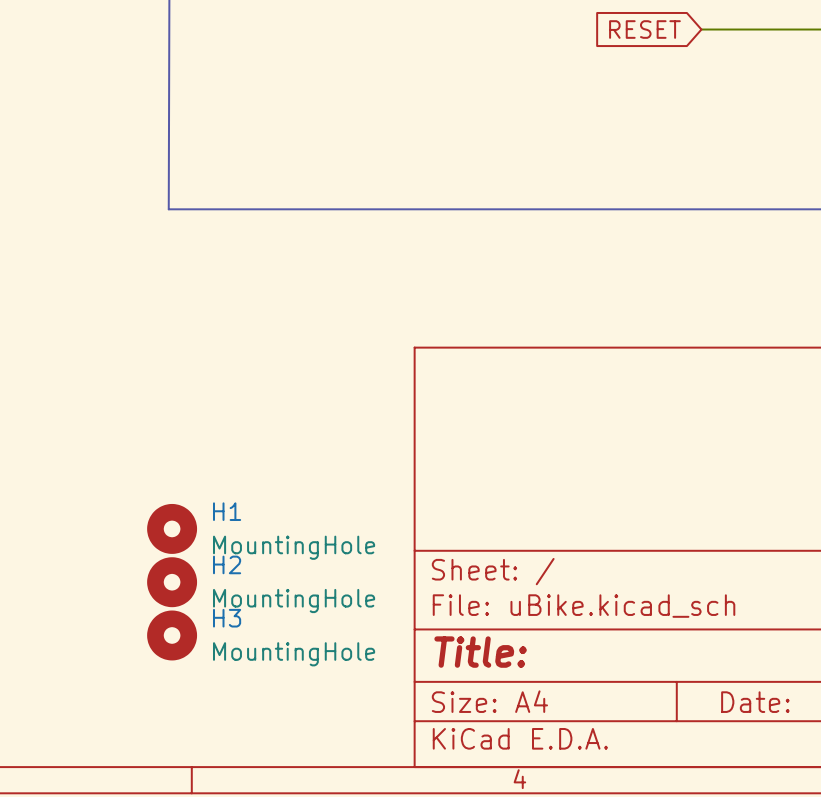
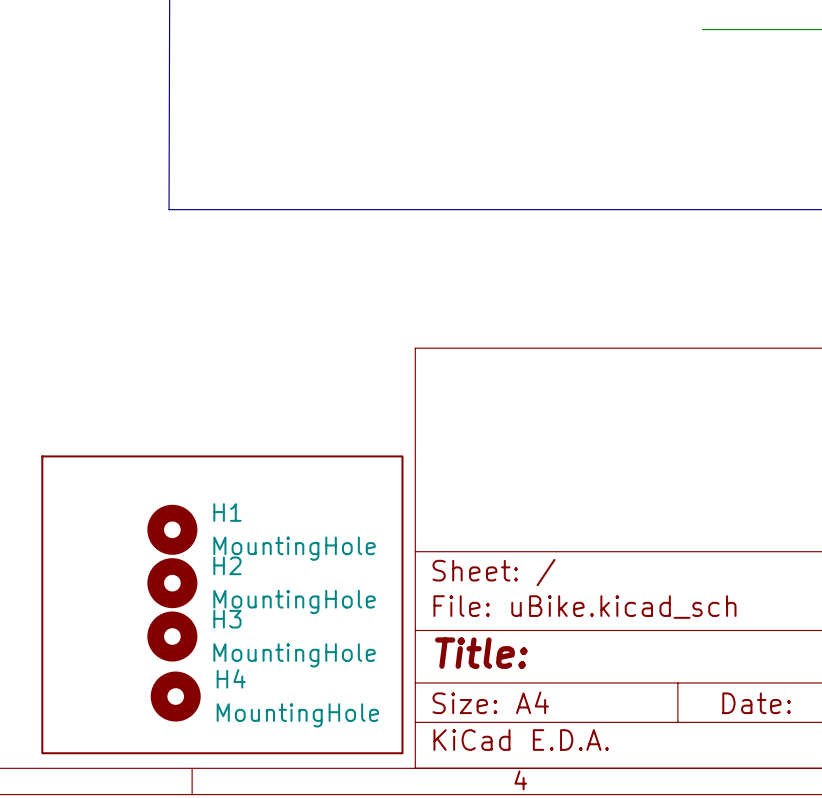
global label: RESET (644, 29) -> none
sheet: none -> (222, 604)
H4: none -> MountingHole (175, 696)

